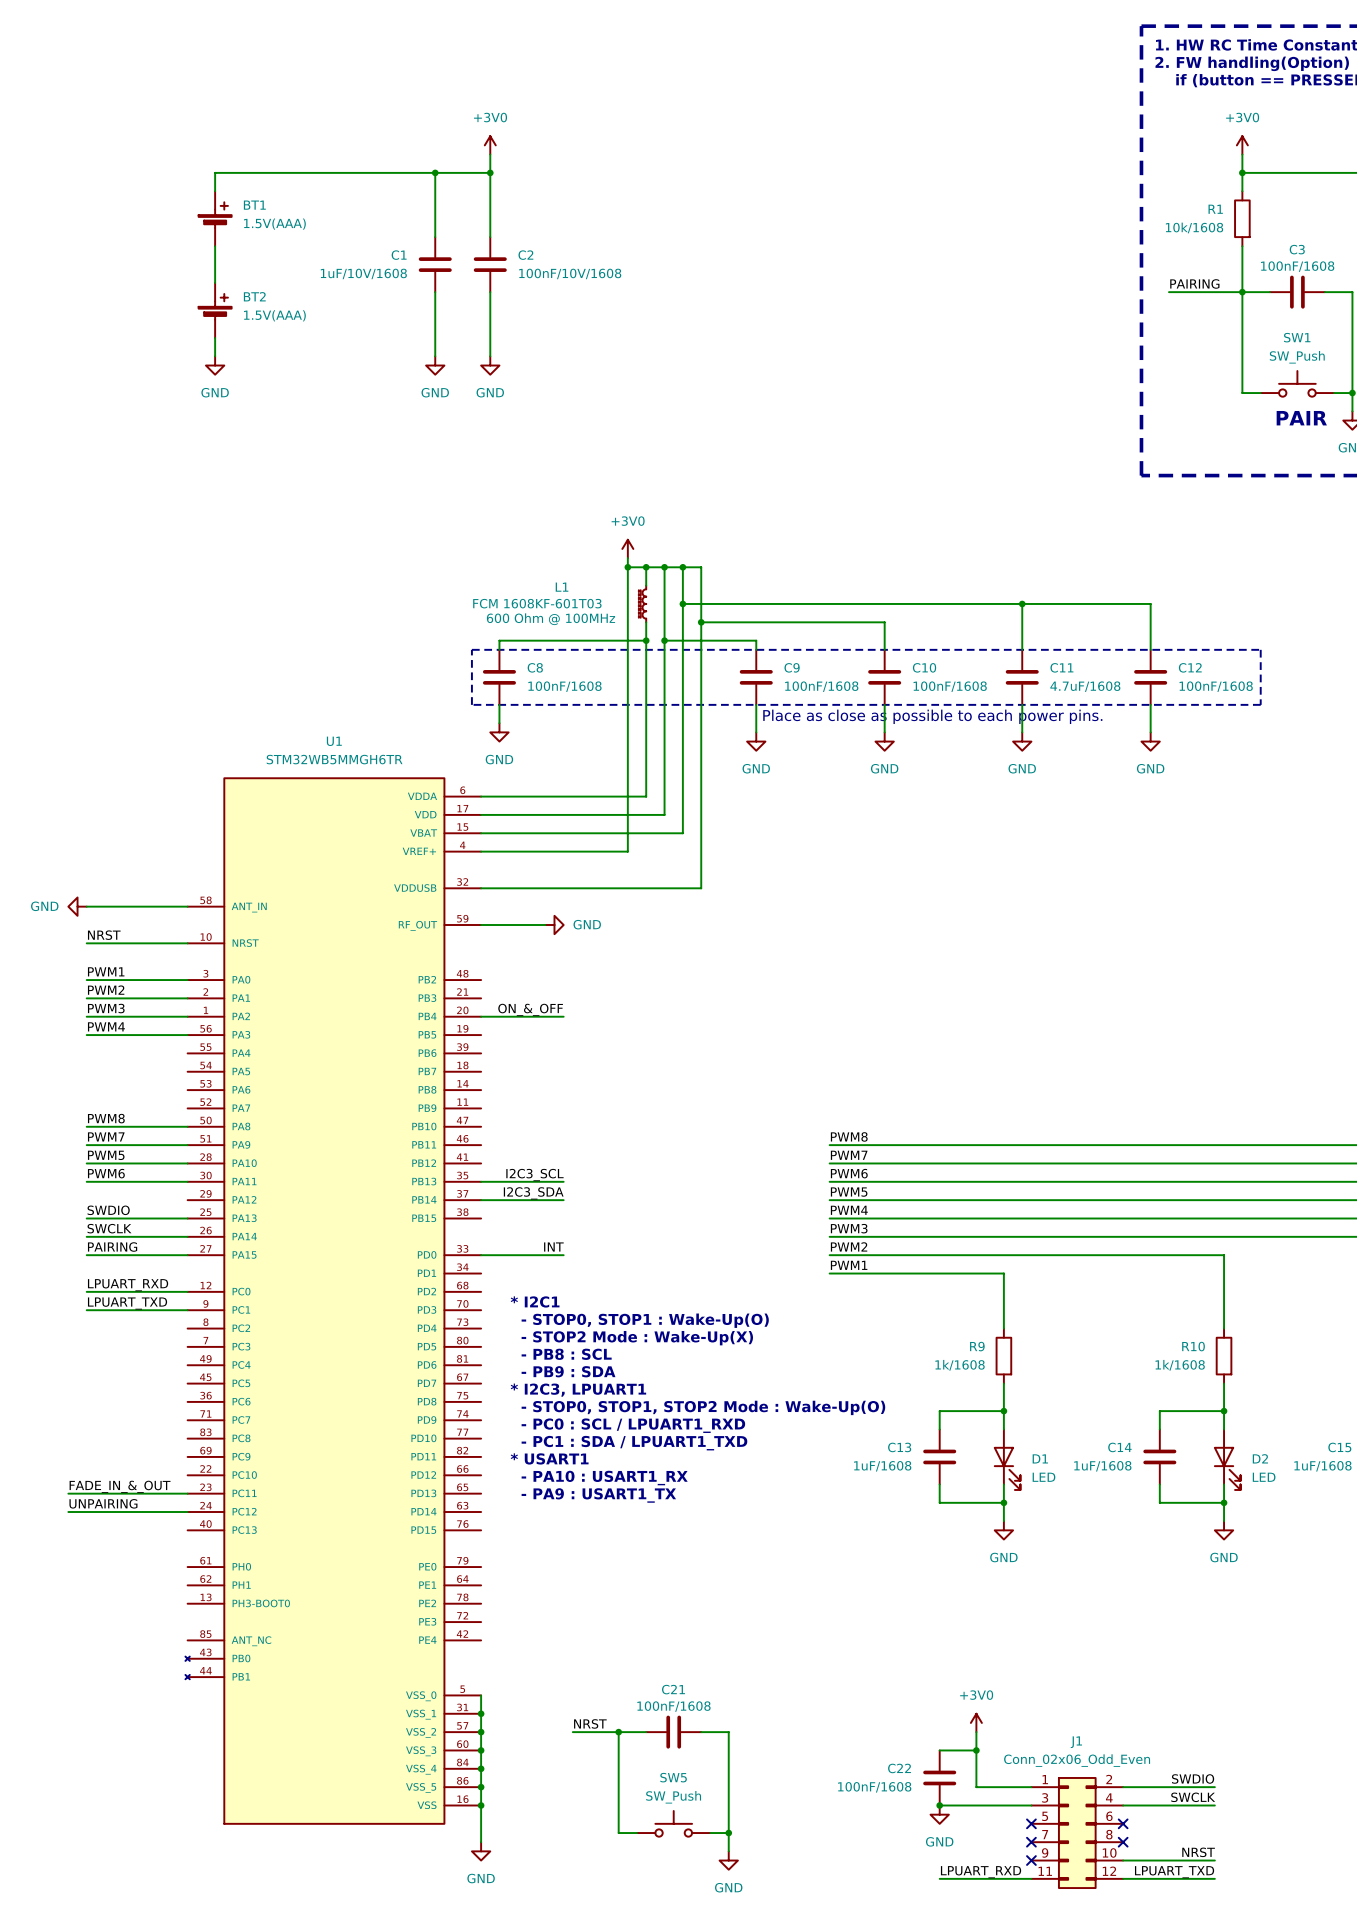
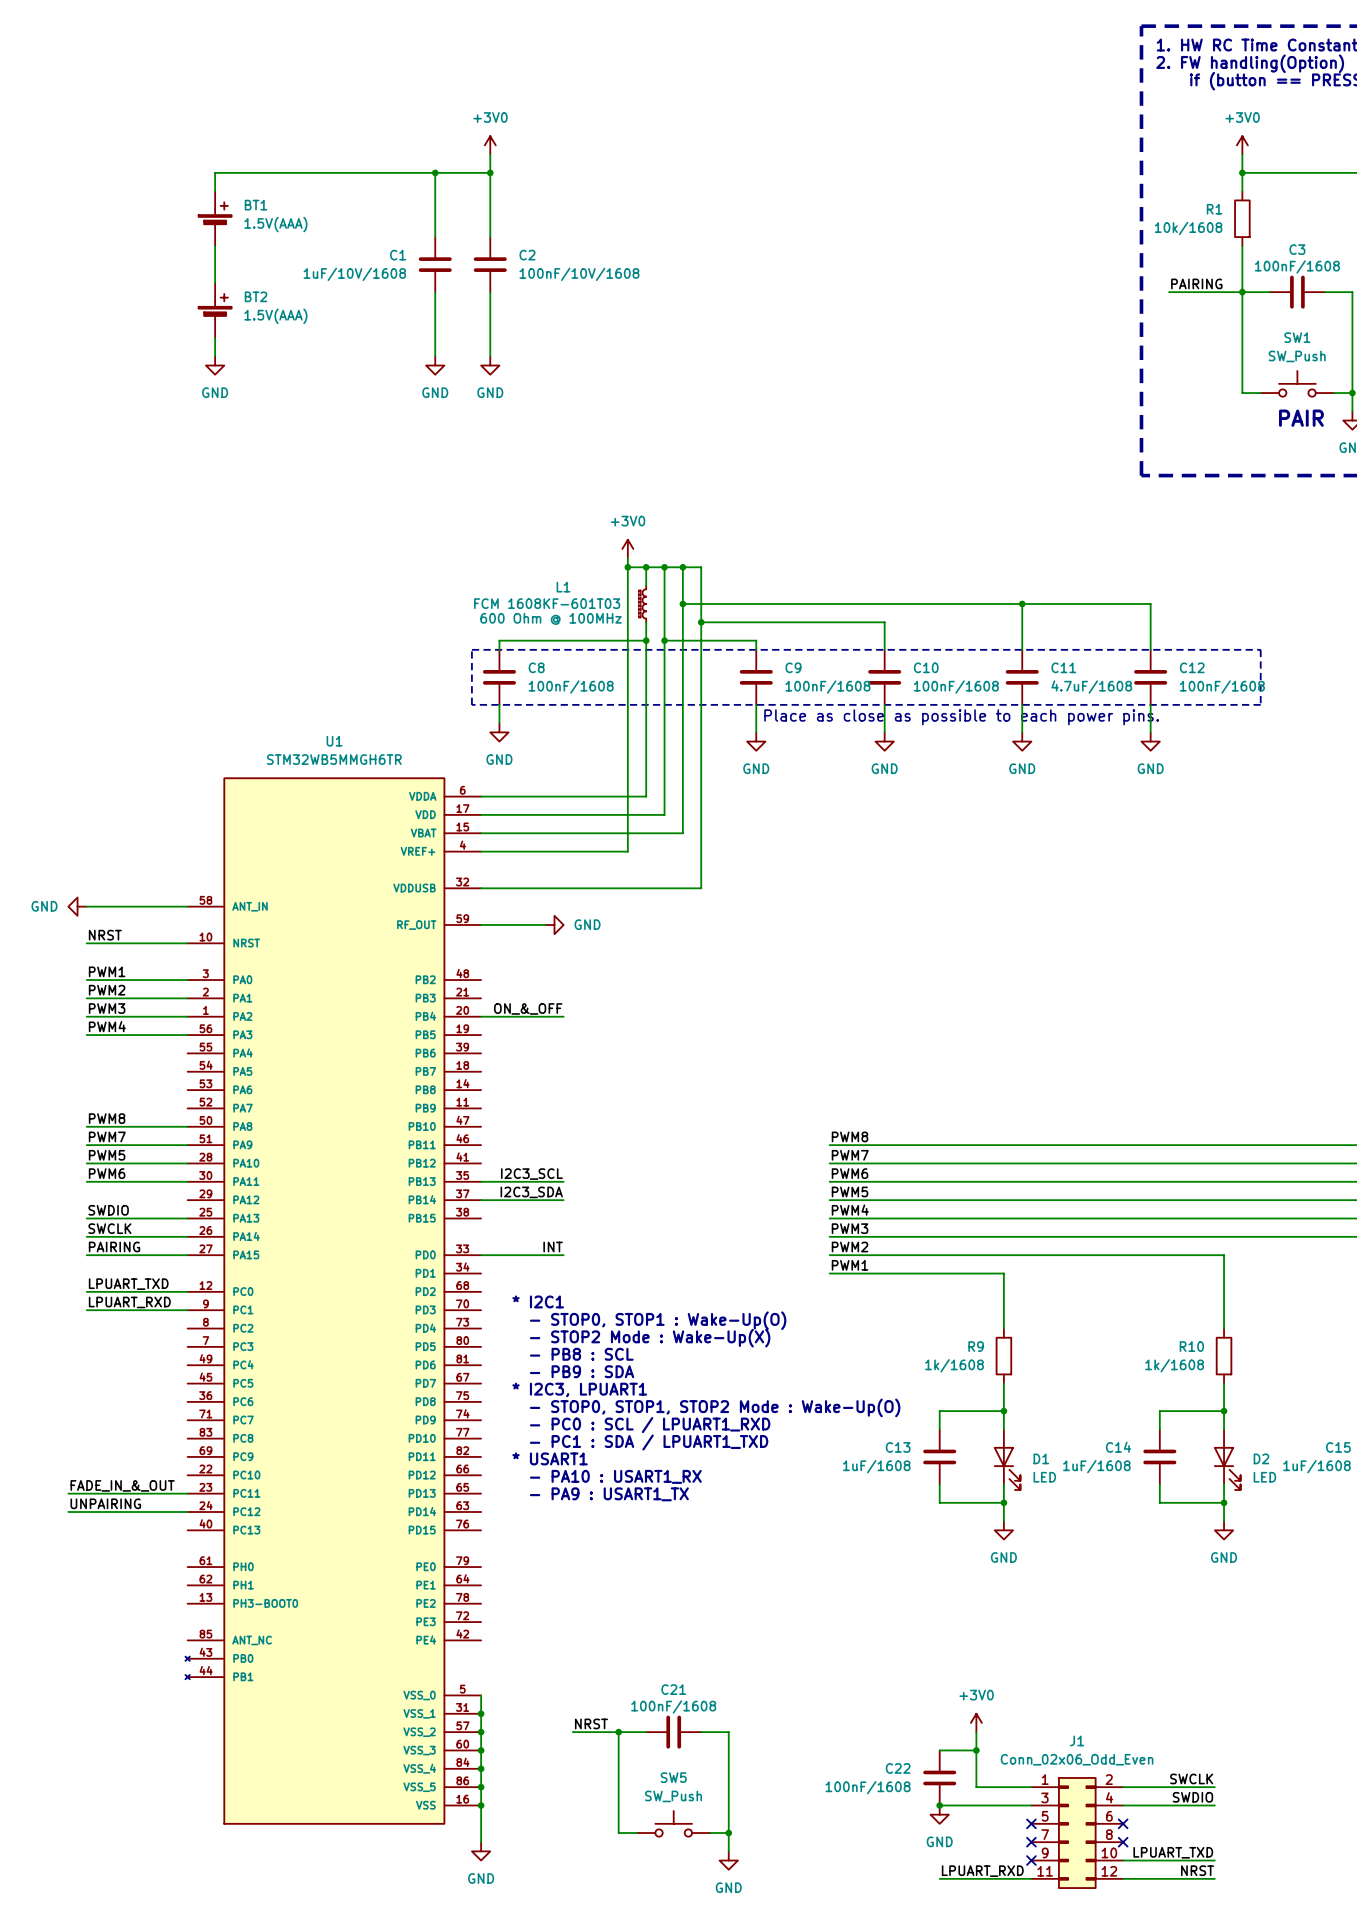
label: LPUART_RXD (128, 1285) -> LPUART_TXD (128, 1284)
label: LPUART_TXD (127, 1303) -> LPUART_RXD (129, 1302)
label: SWDIO (1193, 1778) -> SWCLK (1191, 1778)
label: SWCLK (1193, 1797) -> SWDIO (1192, 1797)
label: NRST (1198, 1852) -> LPUART_TXD (1173, 1852)
label: LPUART_TXD (1174, 1872) -> NRST (1197, 1870)

